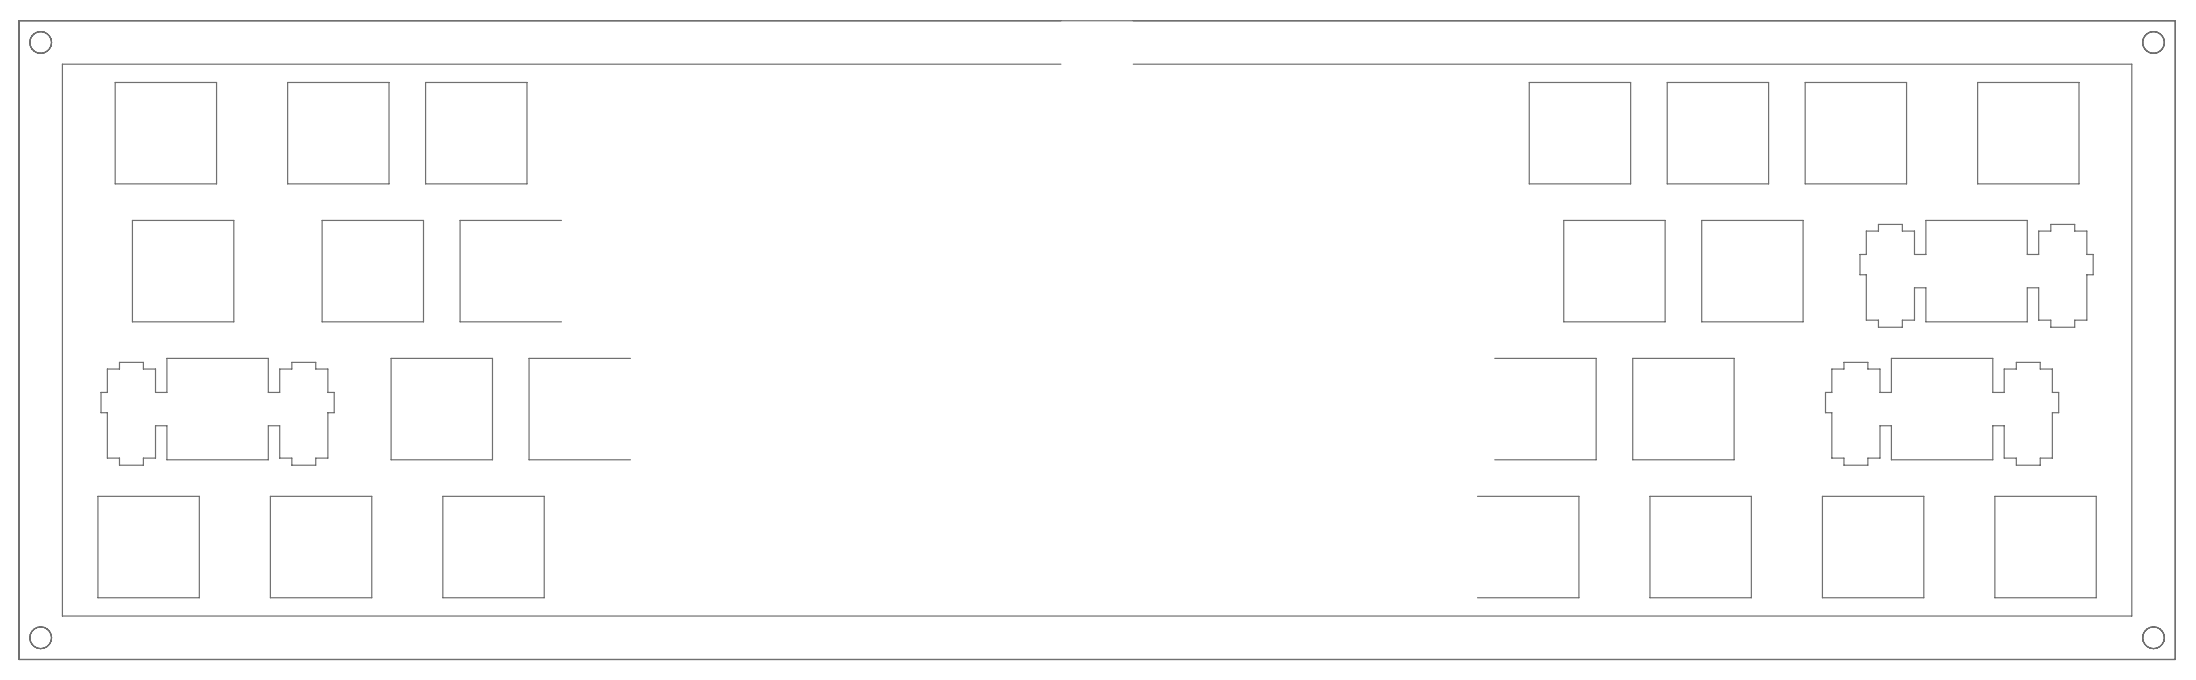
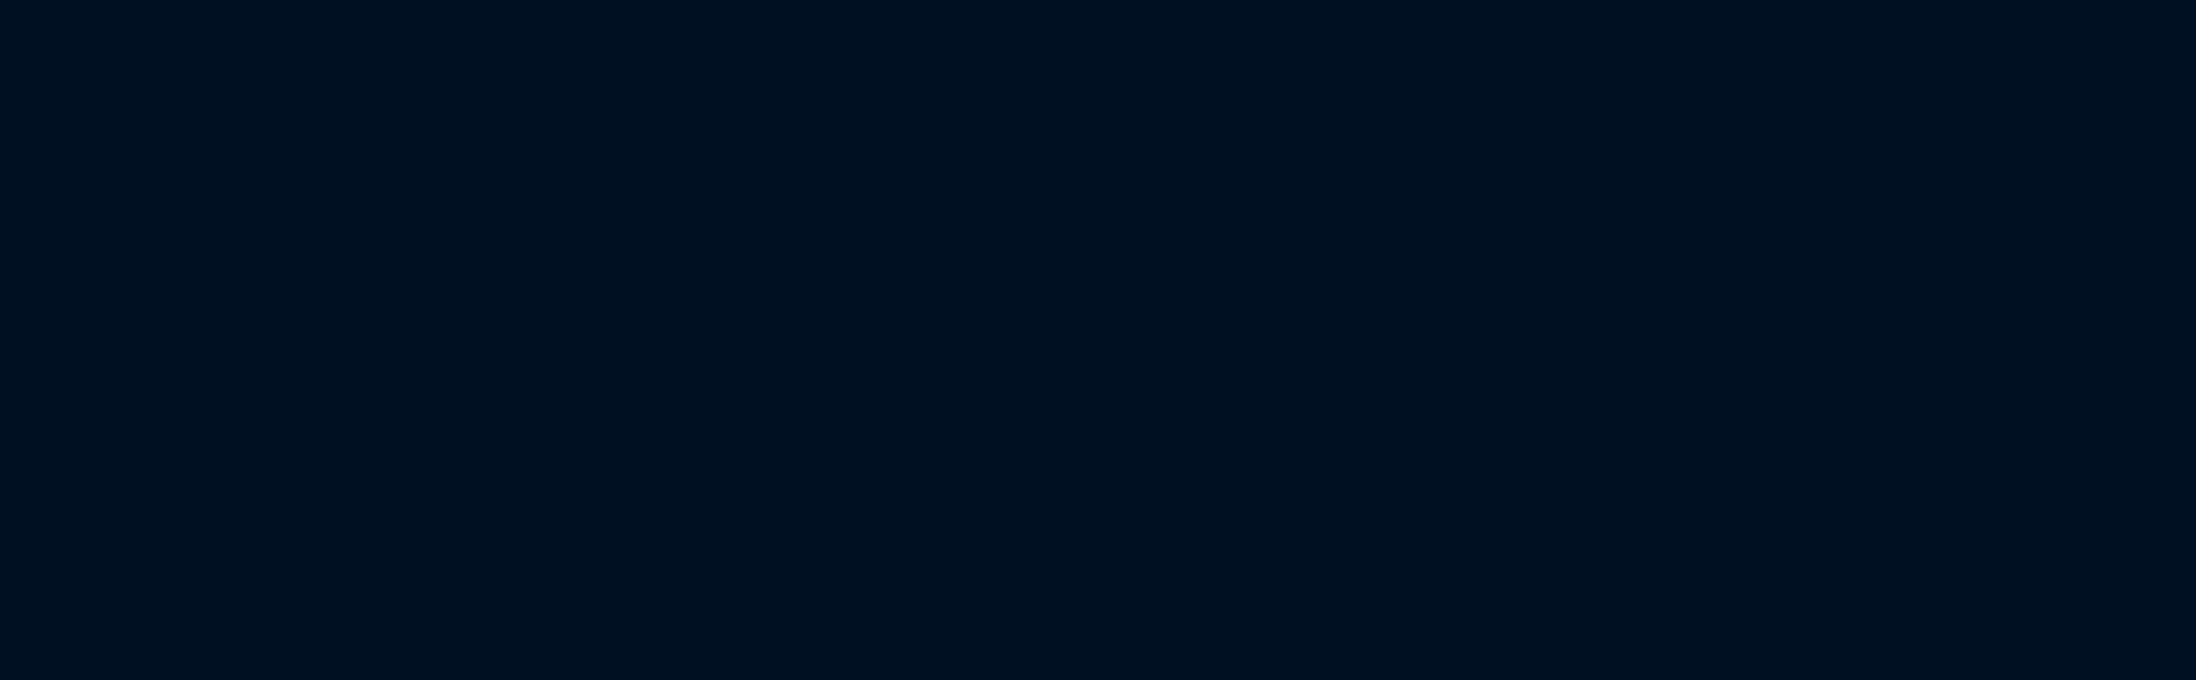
line: (18, 20) (2175, 20) (2175, 659) (18, 659) (18, 20) -> none
line: (40, 31) (34, 33) (29, 42) (31, 48) (40, 53) (49, 48) (51, 42) (47, 33) (40, 31) -> none
line: (2153, 31) (2147, 33) (2142, 42) (2147, 51) (2153, 53) (2162, 48) (2164, 42) (2162, 36) (2153, 31) -> none
line: (1060, 64) (62, 64) (62, 616) (2131, 616) (2131, 64) (1133, 64) -> none
line: (115, 82) (216, 82) (216, 183) (115, 183) (115, 82) -> none
line: (287, 82) (389, 82) (389, 183) (287, 183) (287, 82) -> none
line: (425, 82) (526, 82) (526, 183) (425, 183) (425, 82) -> none
line: (1529, 82) (1630, 82) (1630, 183) (1529, 183) (1529, 82) -> none
line: (1667, 82) (1768, 82) (1768, 183) (1667, 183) (1667, 82) -> none
line: (1805, 82) (1906, 82) (1906, 183) (1805, 183) (1805, 82) -> none
line: (1977, 82) (1977, 183) (2079, 183) (2079, 82) (1977, 82) -> none
line: (132, 220) (233, 220) (233, 321) (132, 321) (132, 220) -> none
line: (322, 220) (423, 220) (423, 321) (322, 321) (322, 220) -> none
line: (561, 220) (460, 220) (460, 321) (561, 321) -> none
line: (1563, 220) (1665, 220) (1665, 321) (1563, 321) (1563, 220) -> none
line: (1701, 220) (1701, 321) (1803, 321) (1803, 220) (1701, 220) -> none
line: (1925, 220) (2027, 220) (2027, 254) (2038, 254) (2038, 231) (2050, 231) (2050, 224) (2074, 224) (2074, 231) (2086, 231) (2086, 254) (2093, 254) (2093, 274) (2086, 274) (2086, 320) (2074, 320) (2074, 327) (2050, 327) (2050, 320) (2038, 320) (2038, 287) (2027, 287) (2027, 321) (1925, 321) (1925, 287) (1914, 287) (1914, 320) (1902, 320) (1902, 327) (1878, 327) (1878, 320) (1866, 320) (1866, 274) (1859, 274) (1859, 254) (1866, 254) (1866, 231) (1878, 231) (1878, 224) (1902, 224) (1902, 231) (1914, 231) (1914, 254) (1925, 254) (1925, 220) -> none
line: (166, 358) (268, 358) (268, 392) (279, 392) (279, 369) (291, 369) (291, 362) (315, 362) (315, 369) (327, 369) (327, 392) (334, 392) (334, 412) (327, 412) (327, 458) (315, 458) (315, 465) (291, 465) (291, 458) (279, 458) (279, 425) (268, 425) (268, 459) (166, 459) (166, 425) (155, 425) (155, 458) (143, 458) (143, 465) (119, 465) (119, 458) (107, 458) (107, 412) (101, 412) (101, 392) (107, 392) (107, 369) (119, 369) (119, 362) (143, 362) (143, 369) (155, 369) (155, 392) (166, 392) (166, 358) -> none
line: (391, 358) (492, 358) (492, 459) (391, 459) (391, 358) -> none
line: (630, 358) (529, 358) (529, 459) (630, 459) -> none
line: (1494, 358) (1596, 358) (1596, 459) (1494, 459) -> none
line: (1632, 358) (1632, 459) (1734, 459) (1734, 358) (1632, 358) -> none
line: (1891, 358) (1992, 358) (1992, 392) (2004, 392) (2004, 369) (2016, 369) (2016, 362) (2040, 362) (2040, 369) (2052, 369) (2052, 392) (2058, 392) (2058, 412) (2052, 412) (2052, 458) (2040, 458) (2040, 465) (2016, 465) (2016, 458) (2004, 458) (2004, 425) (1992, 425) (1992, 459) (1891, 459) (1891, 425) (1879, 425) (1879, 458) (1867, 458) (1867, 465) (1843, 465) (1843, 458) (1831, 458) (1831, 412) (1825, 412) (1825, 392) (1831, 392) (1831, 369) (1843, 369) (1843, 362) (1867, 362) (1867, 369) (1879, 369) (1879, 392) (1891, 392) (1891, 358) -> none
line: (97, 496) (199, 496) (199, 597) (97, 597) (97, 496) -> none
line: (270, 496) (371, 496) (371, 597) (270, 597) (270, 496) -> none
line: (442, 496) (544, 496) (544, 597) (442, 597) (442, 496) -> none
line: (1477, 496) (1578, 496) (1578, 597) (1477, 597) -> none
line: (1649, 496) (1751, 496) (1751, 597) (1649, 597) (1649, 496) -> none
line: (1822, 496) (1923, 496) (1923, 597) (1822, 597) (1822, 496) -> none
line: (1994, 496) (1994, 597) (2096, 597) (2096, 496) (1994, 496) -> none
line: (40, 626) (31, 631) (29, 637) (34, 646) (40, 648) (47, 646) (51, 637) (49, 631) (40, 626) -> none
line: (2153, 626) (2147, 628) (2142, 637) (2147, 646) (2153, 648) (2162, 644) (2164, 637) (2162, 631) (2153, 626) -> none

